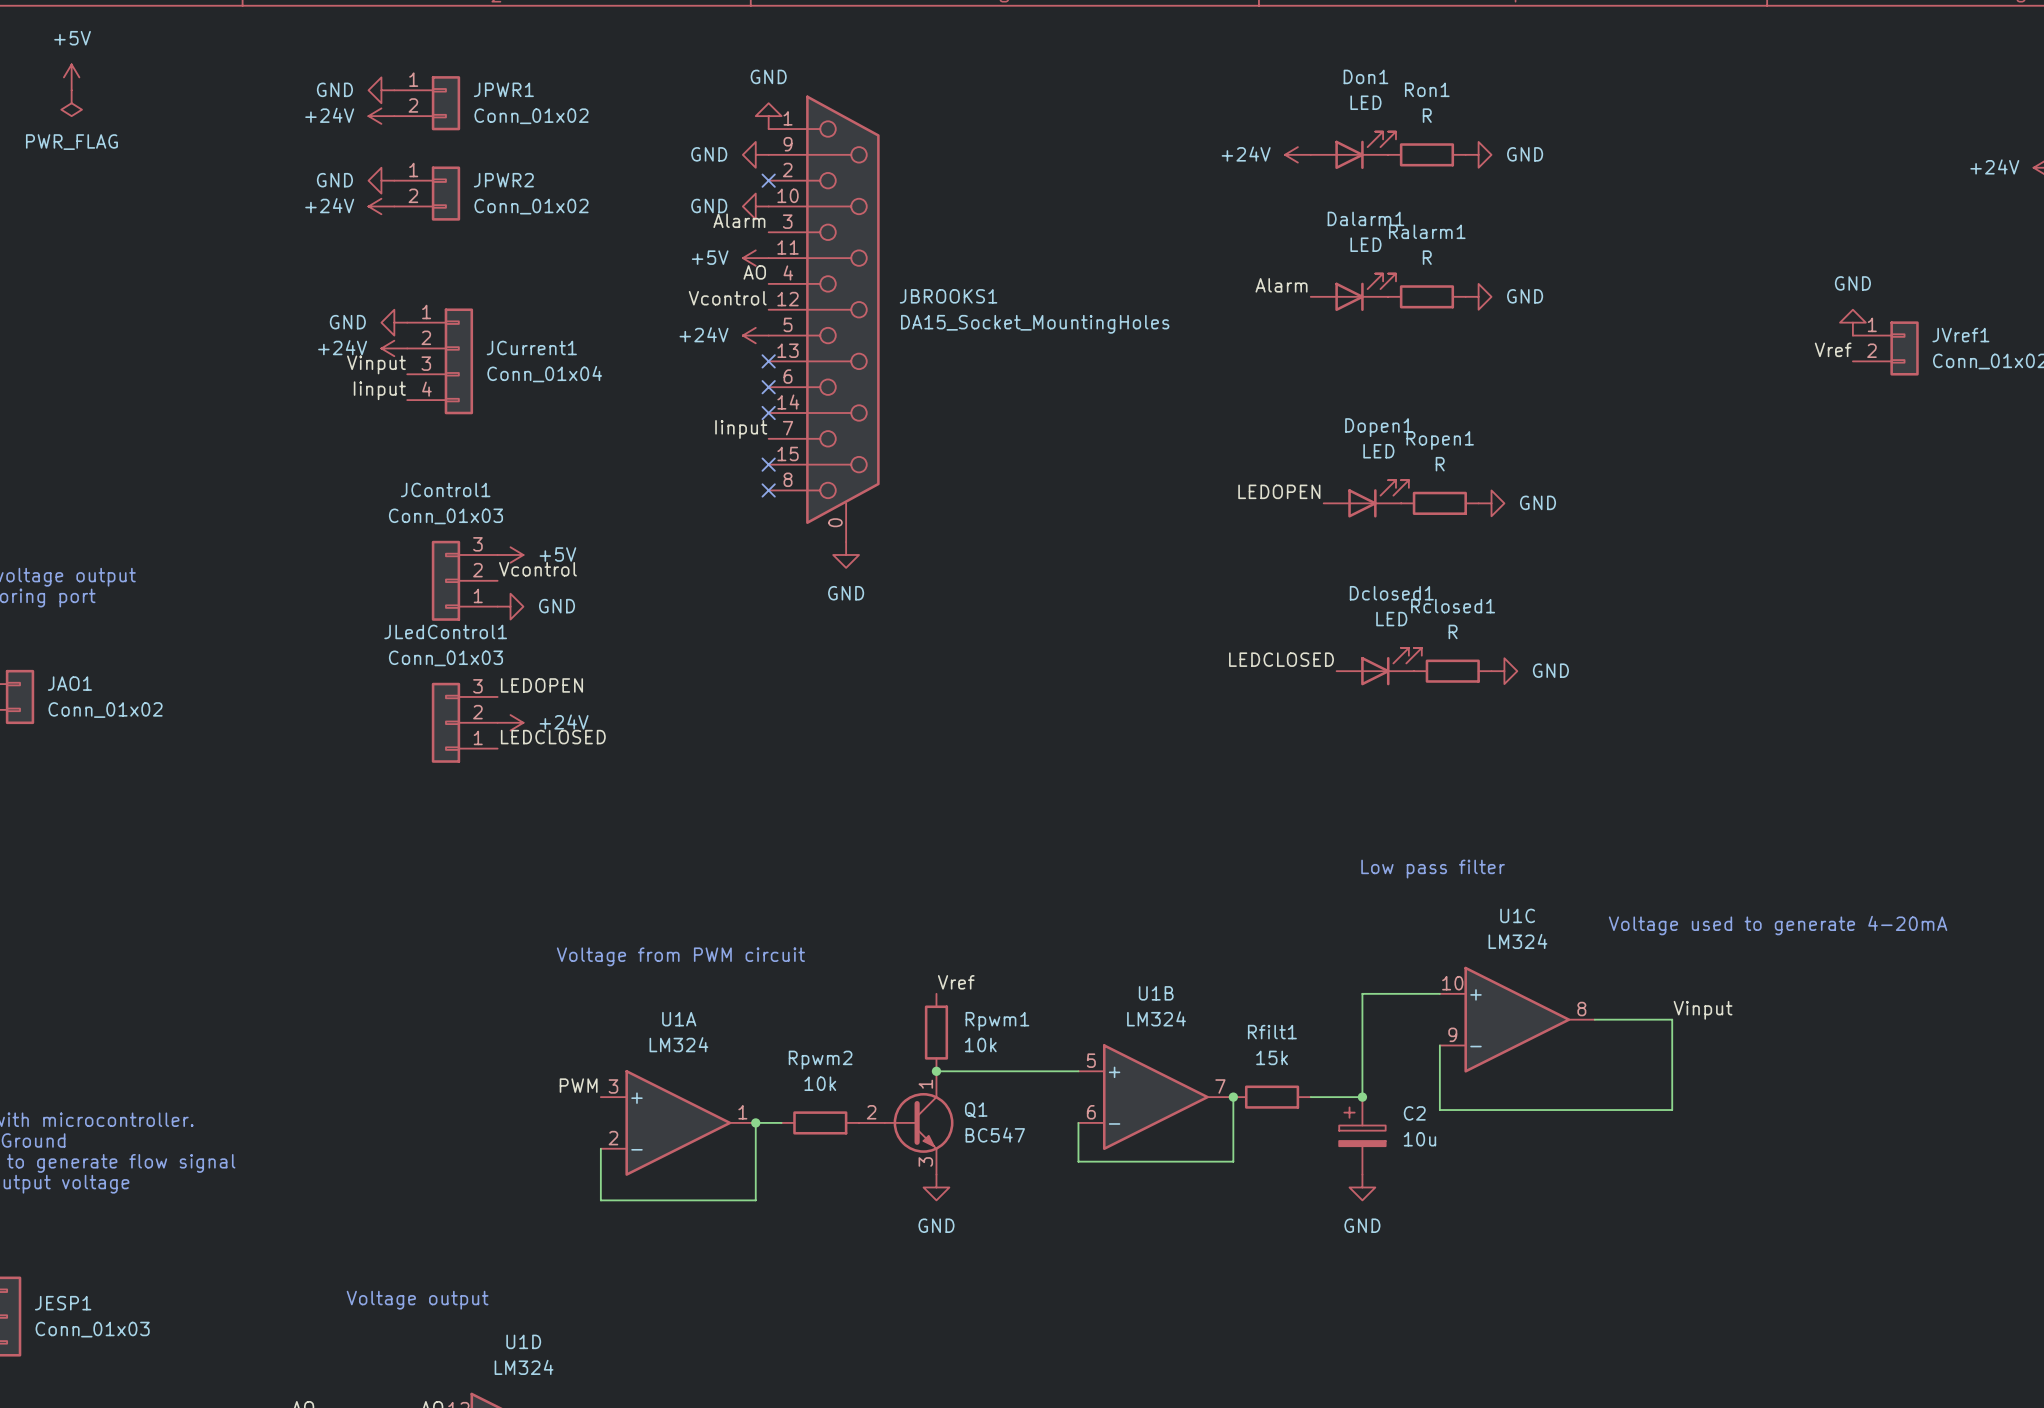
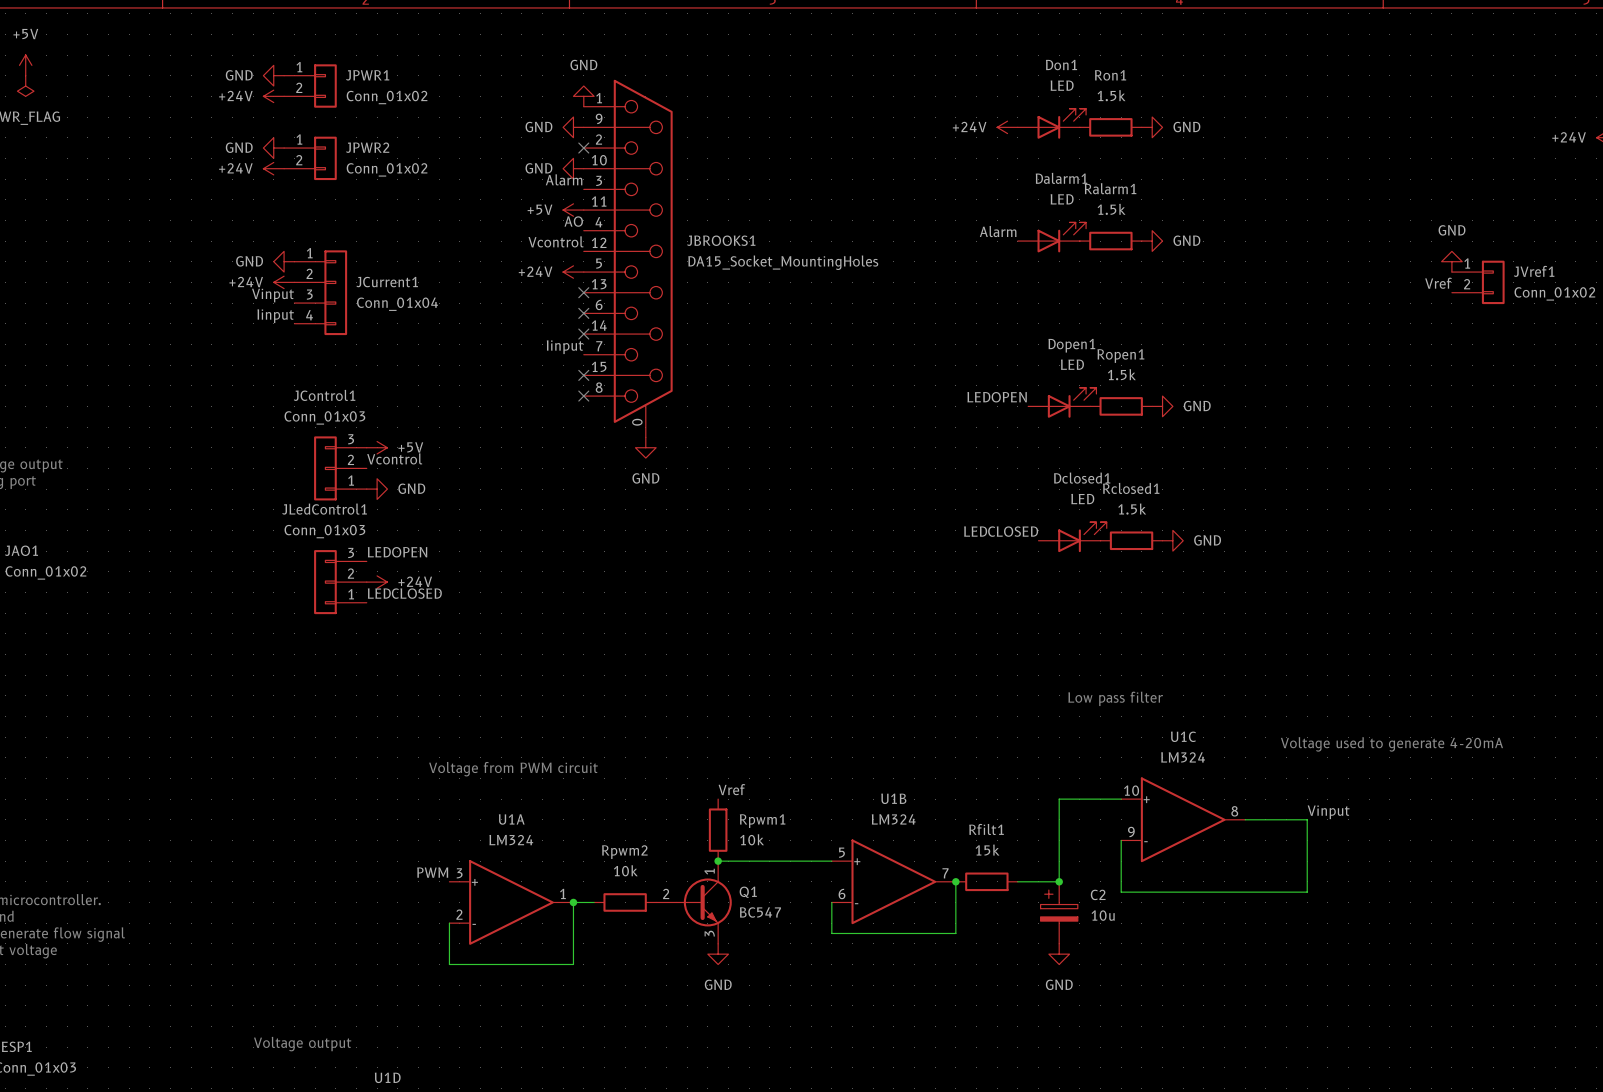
Ron1 value: R (1427, 115) -> 1.5k (1111, 95)
Ralarm1 value: R (1427, 257) -> 1.5k (1111, 209)
Ropen1 value: R (1440, 464) -> 1.5k (1121, 374)
Rclosed1 value: R (1453, 631) -> 1.5k (1132, 509)

